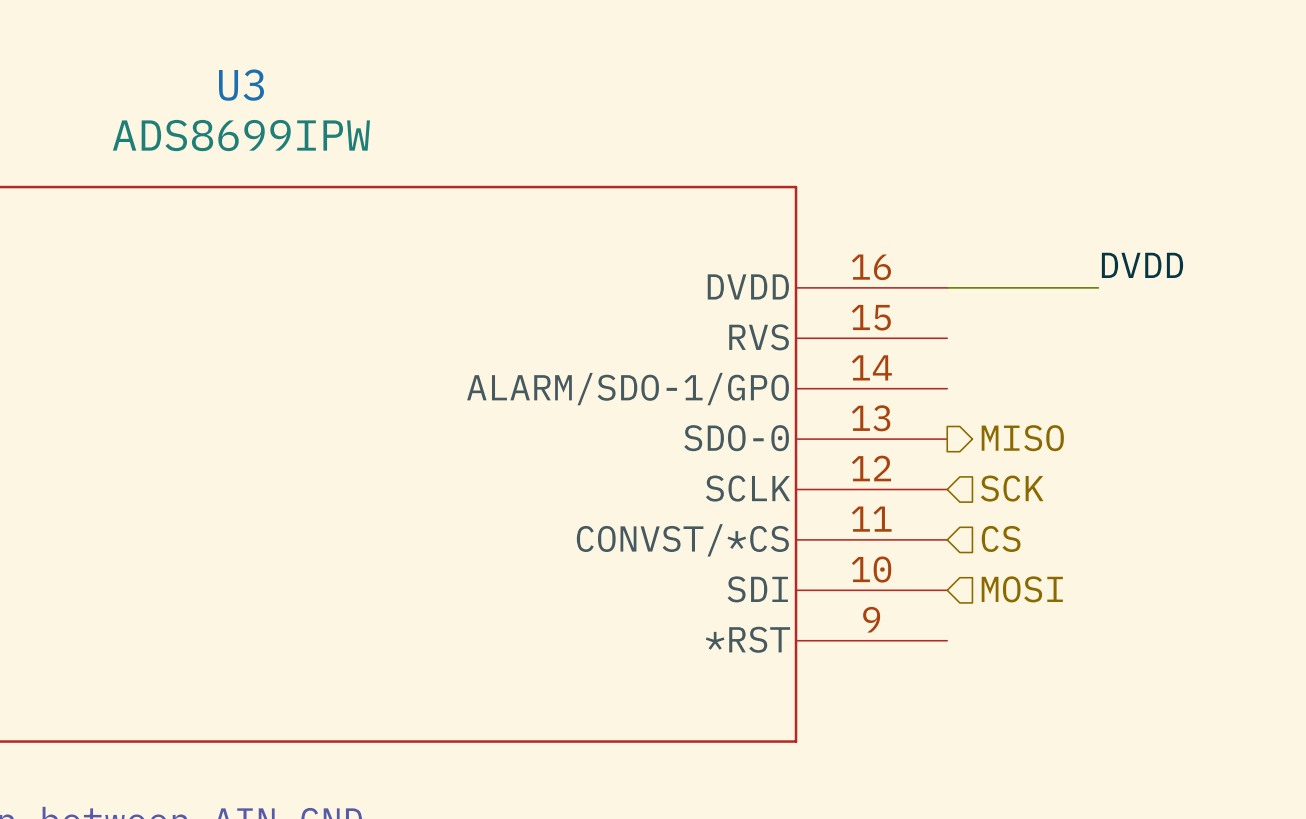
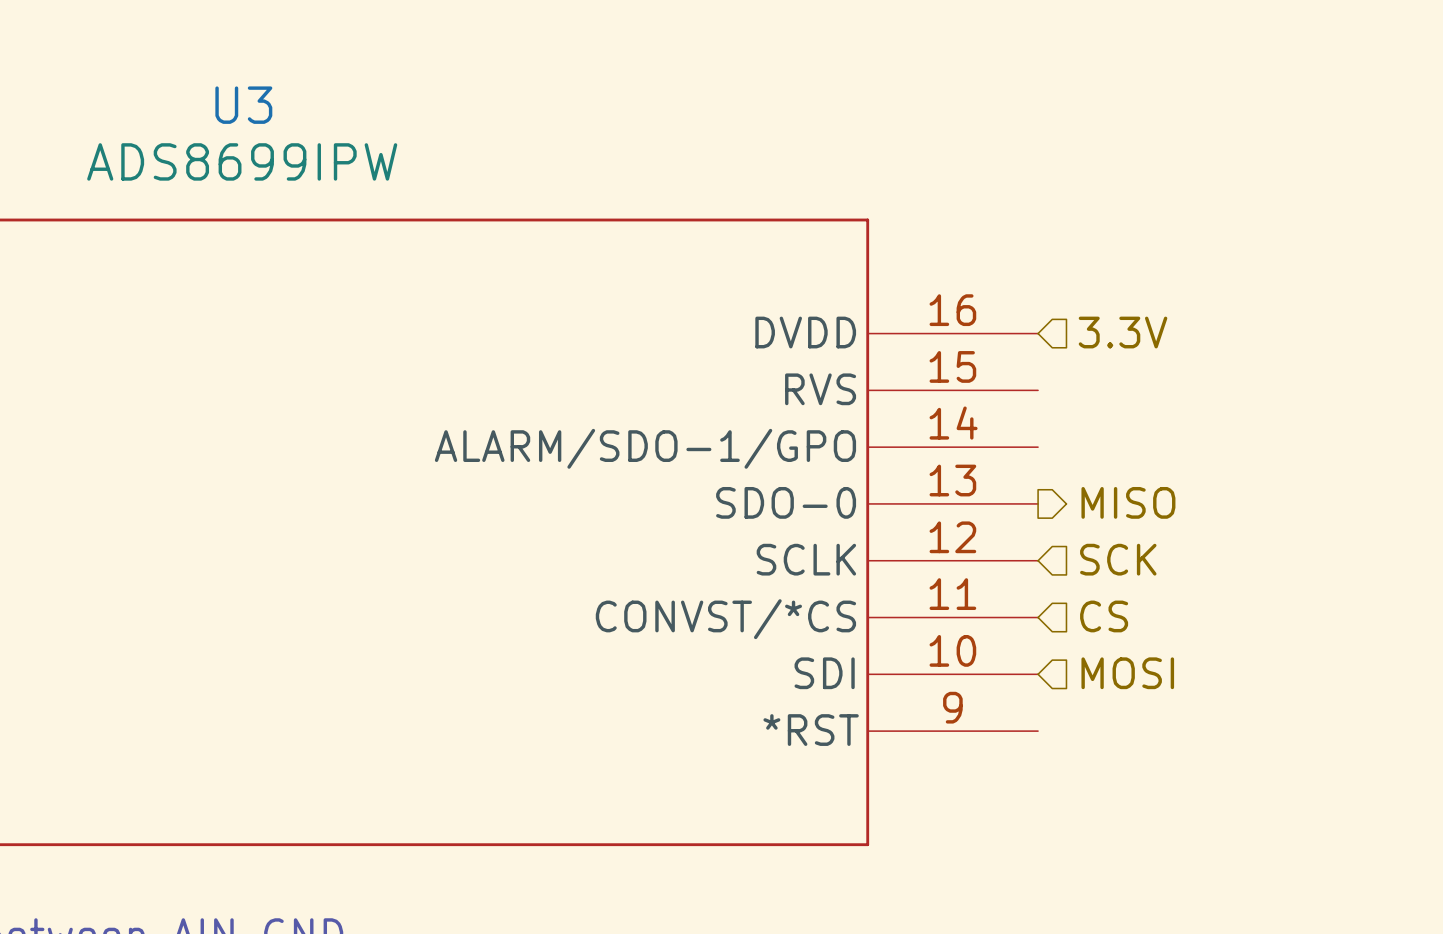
label: DVDD (1142, 265) -> none
hierarchical label: none -> 3.3V (1123, 332)
wire: (947, 287) (1098, 287) -> none

